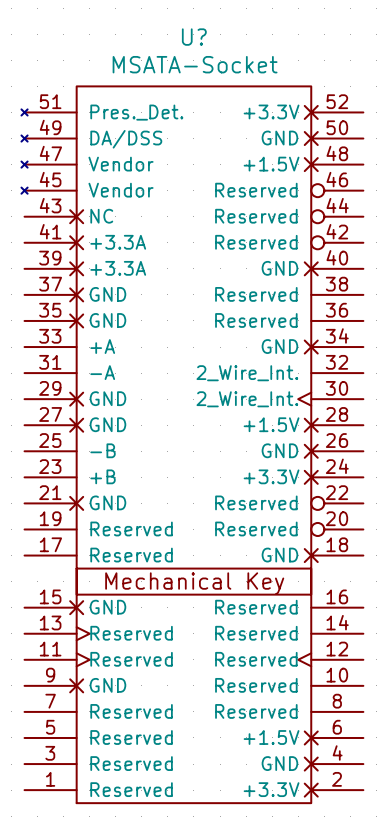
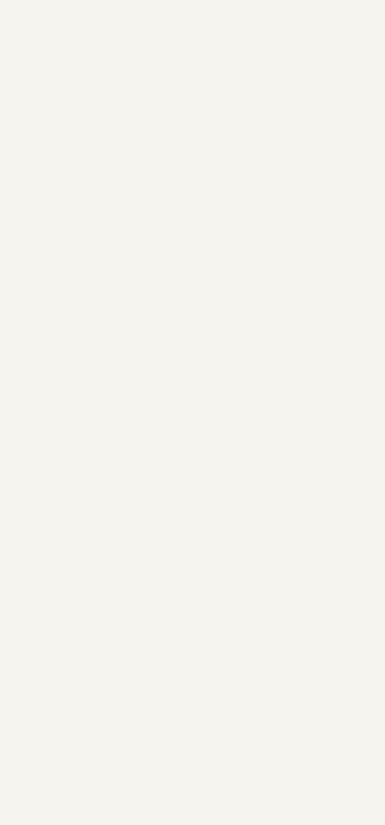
U?: MSATA-Socket (192, 444) -> none

